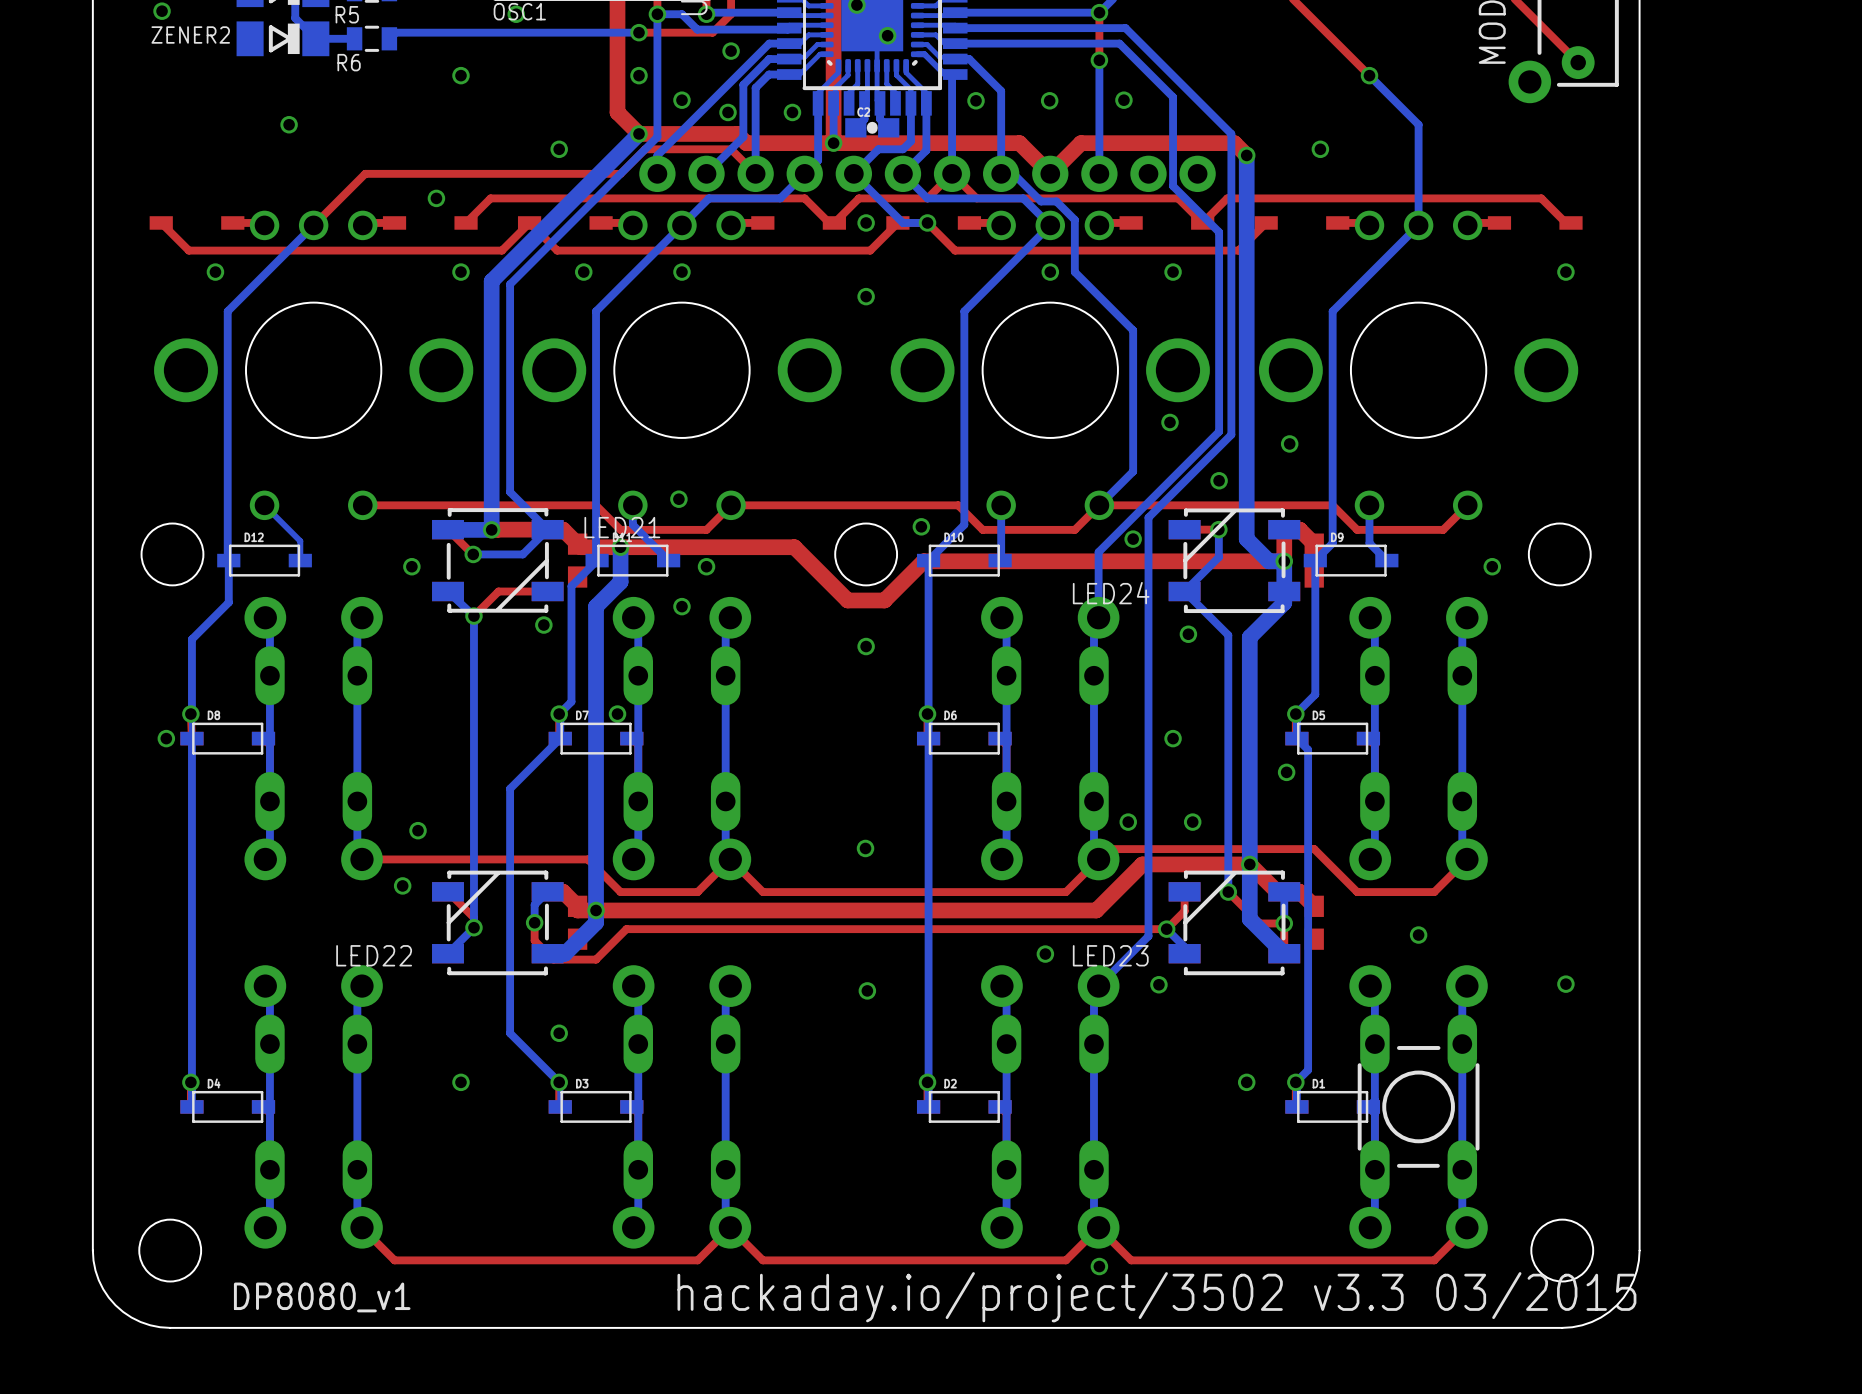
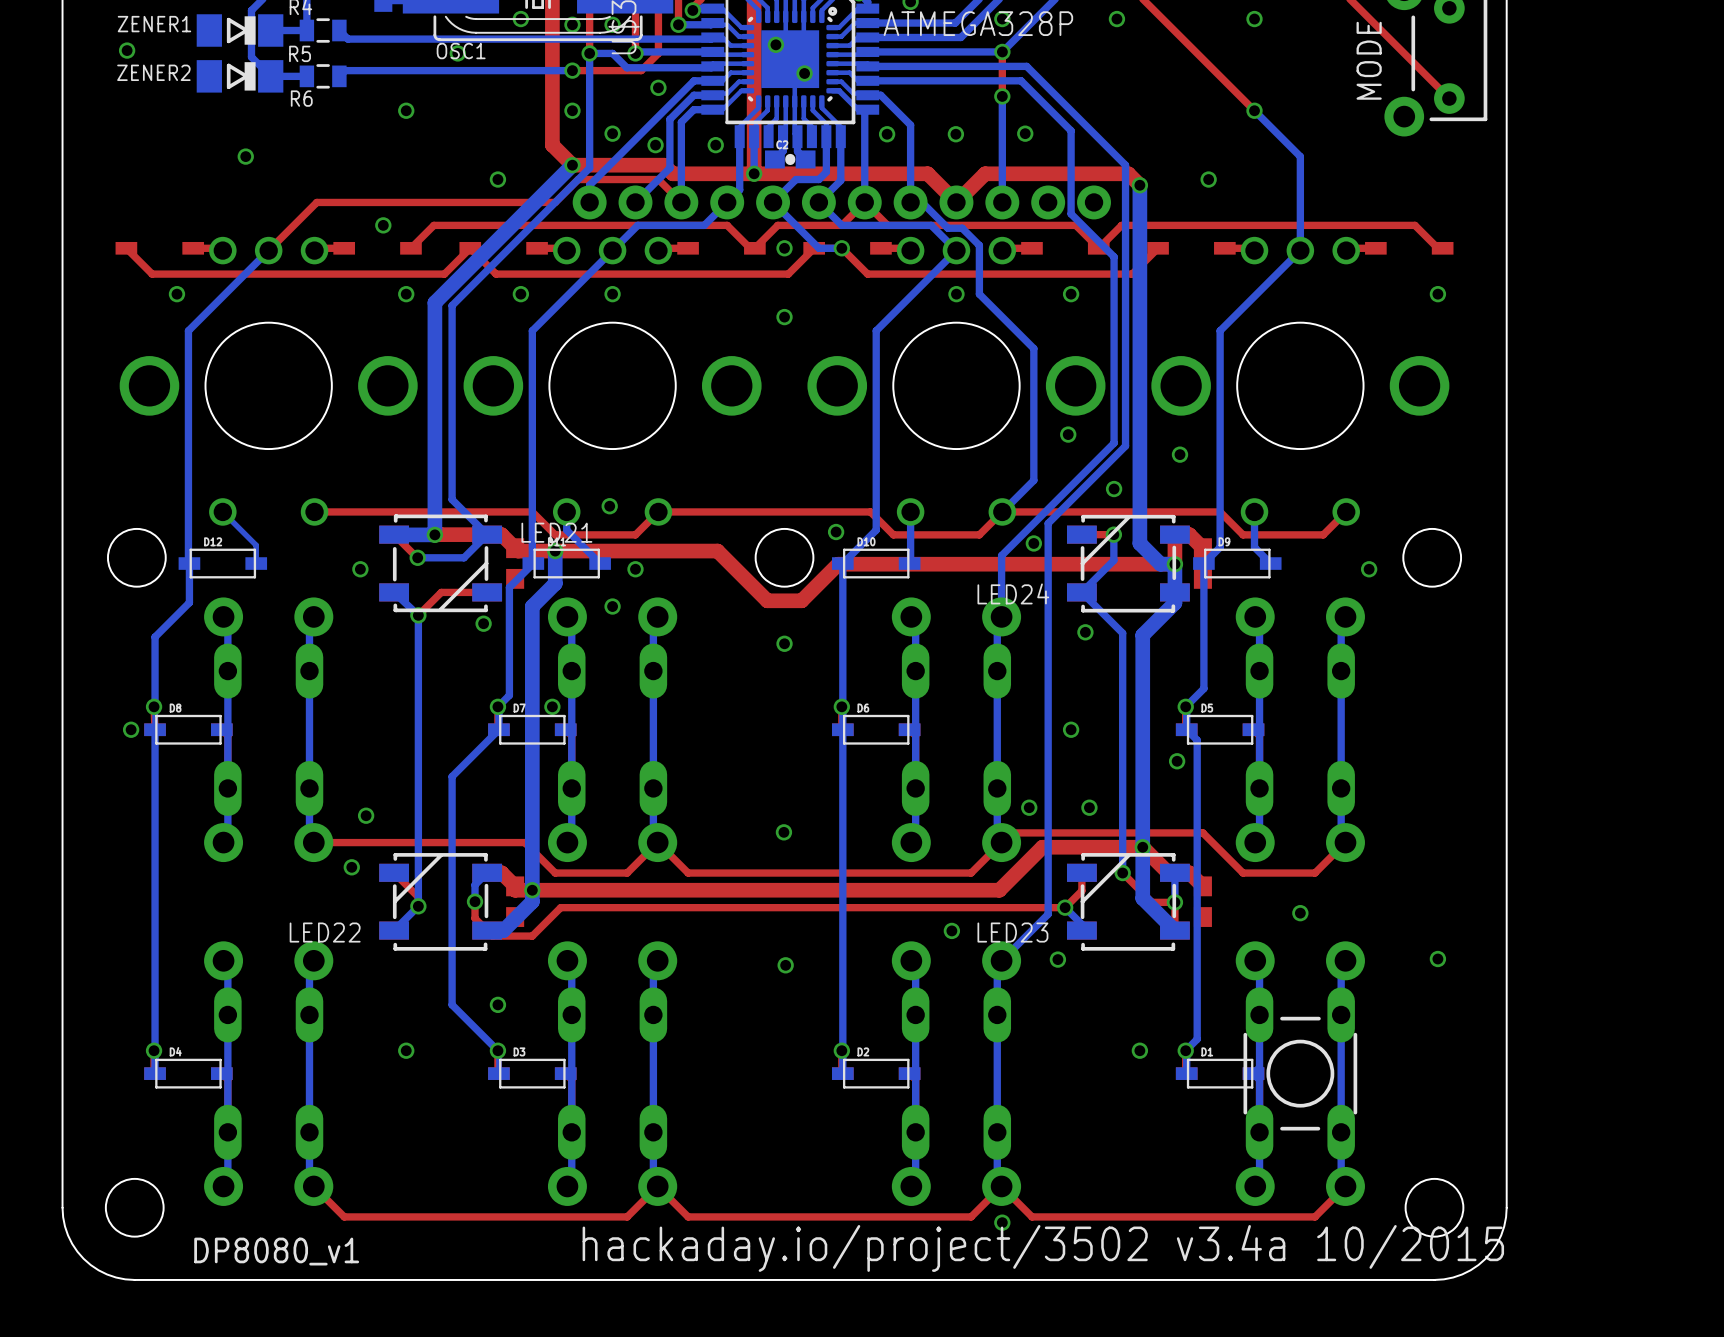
text: hackaday.io/project/3502 v3.3 03/2015 (1156, 1297) -> hackaday.io/project/3502 v3.4a 10/2015 (1043, 1248)

